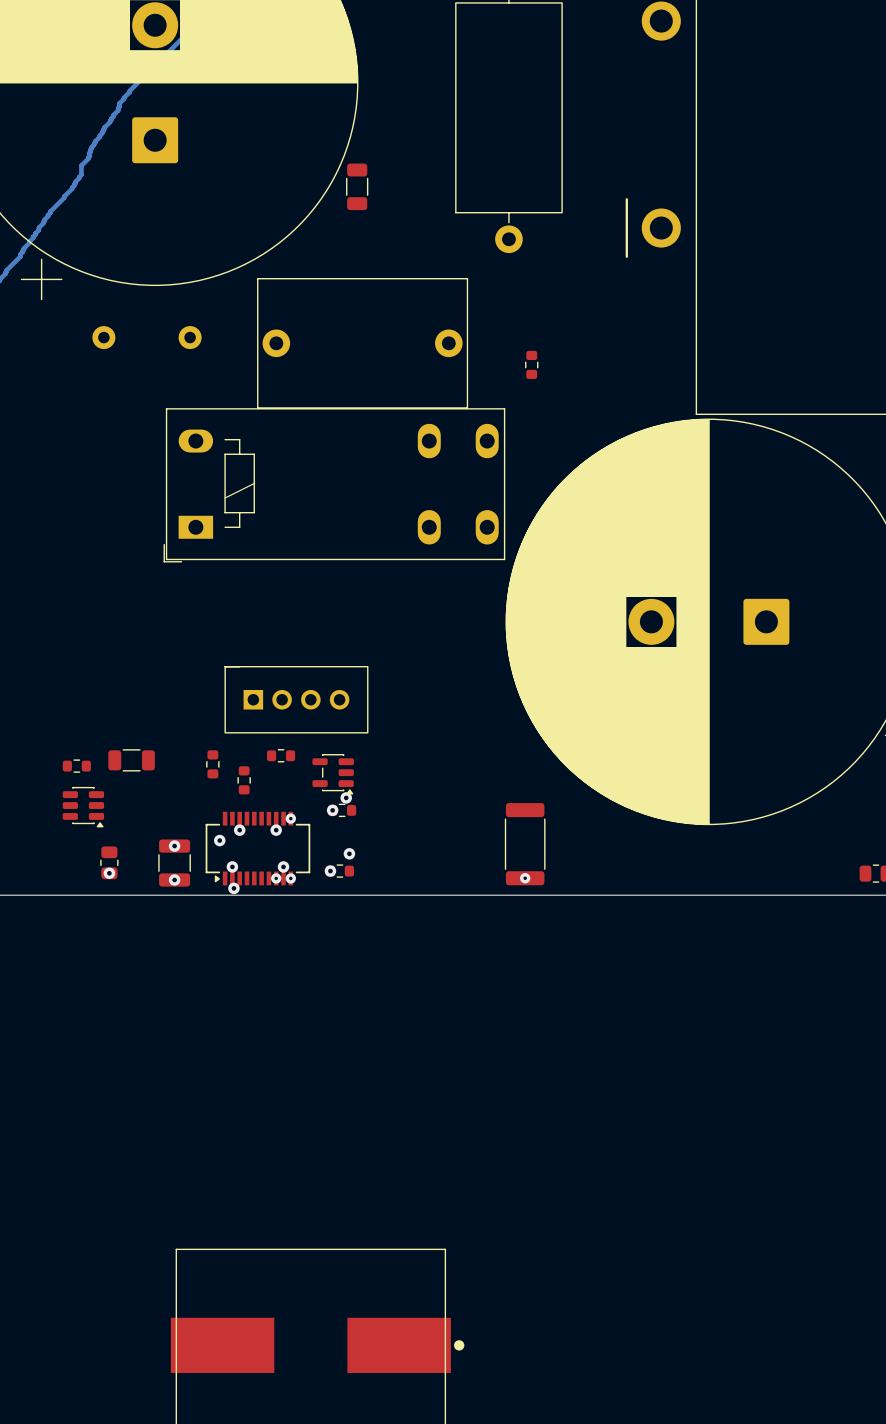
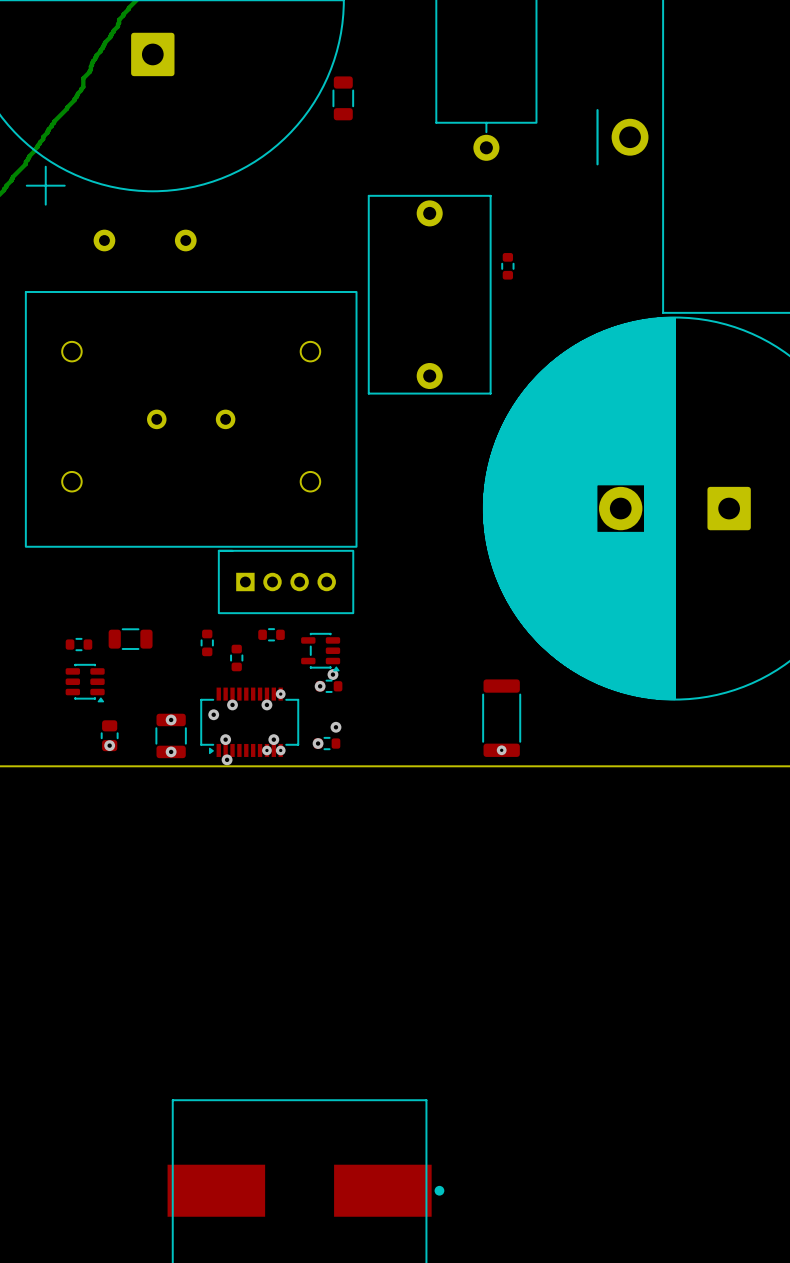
part rotation: 0° (362, 343) -> 90° clockwise (429, 294)
part: (334, 485) -> none
part: none -> (191, 419)

